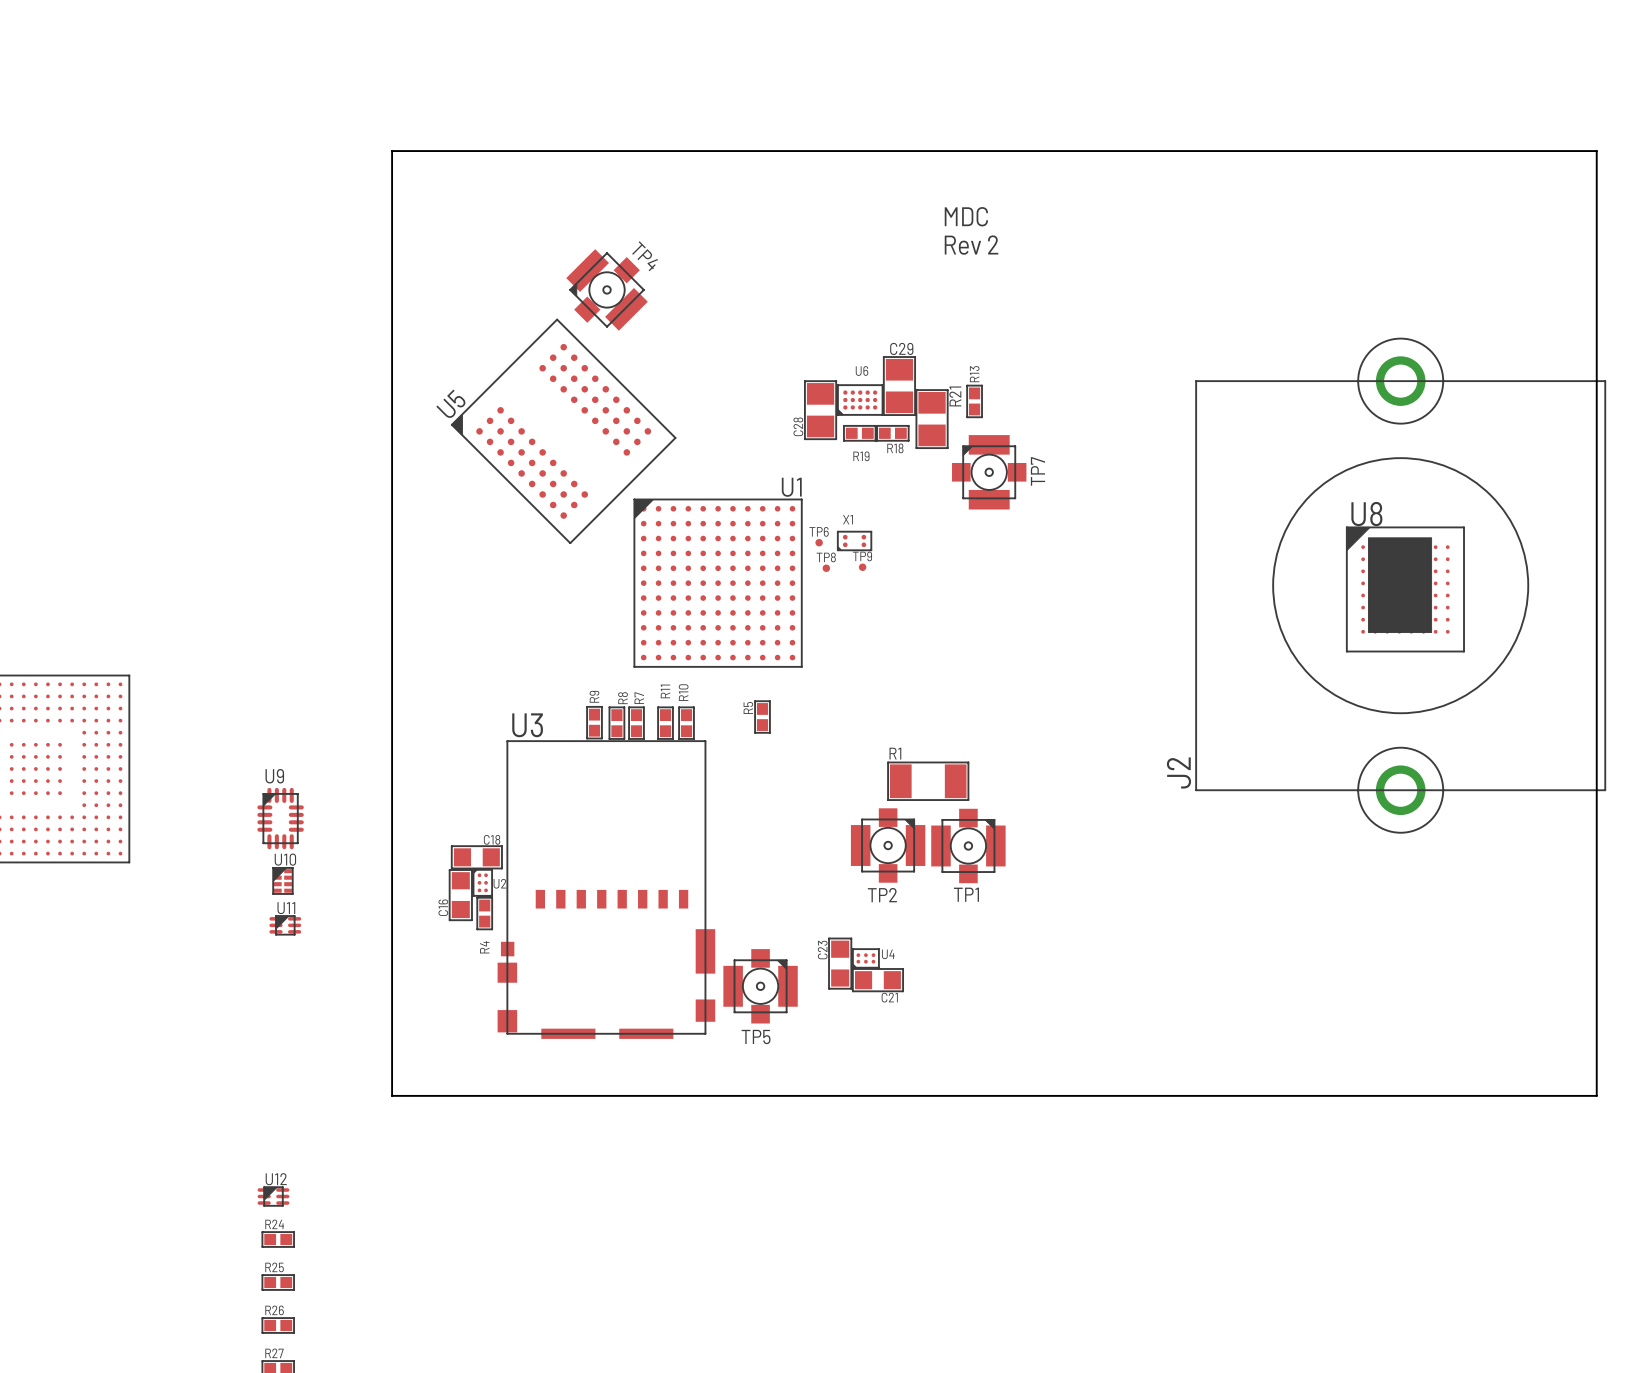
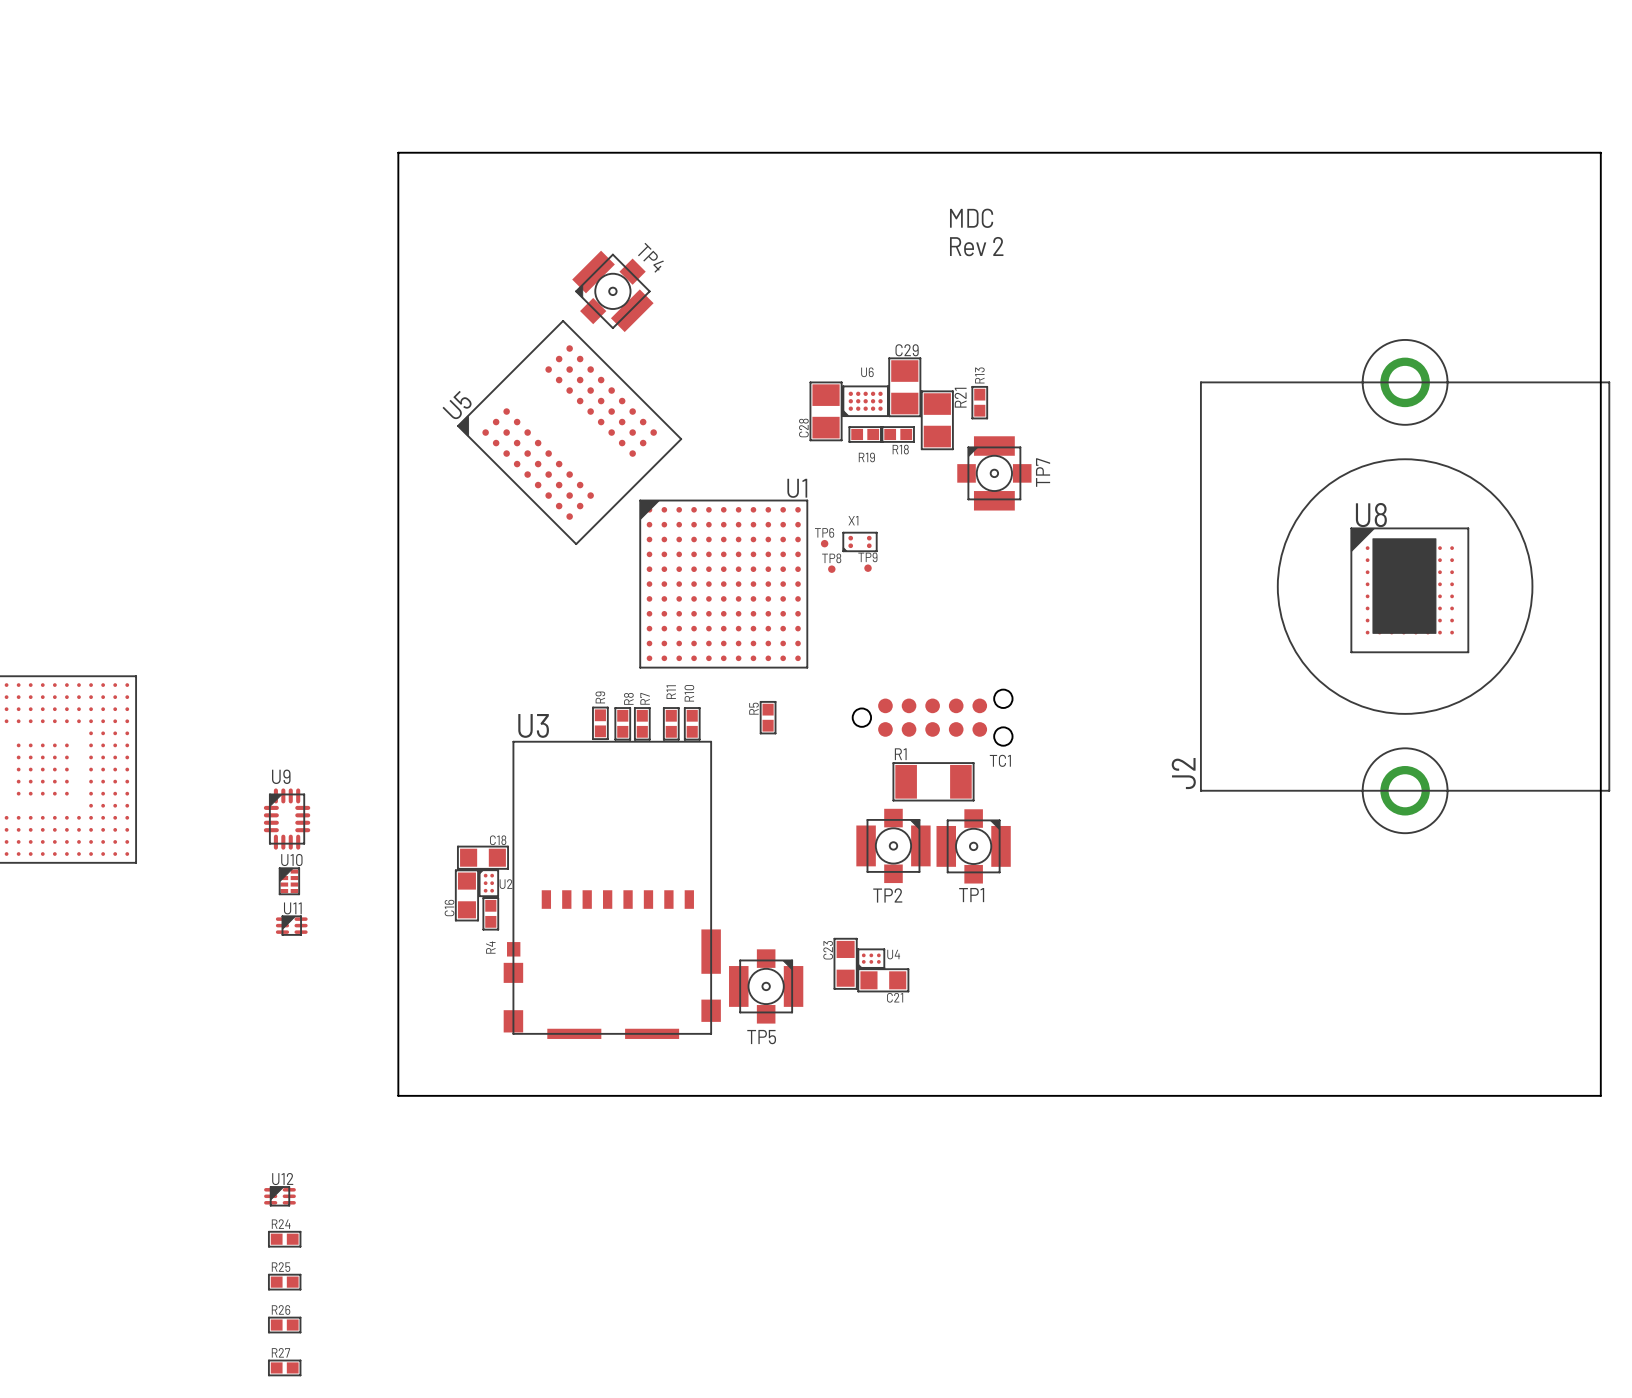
TC1: none -> (932, 717)

